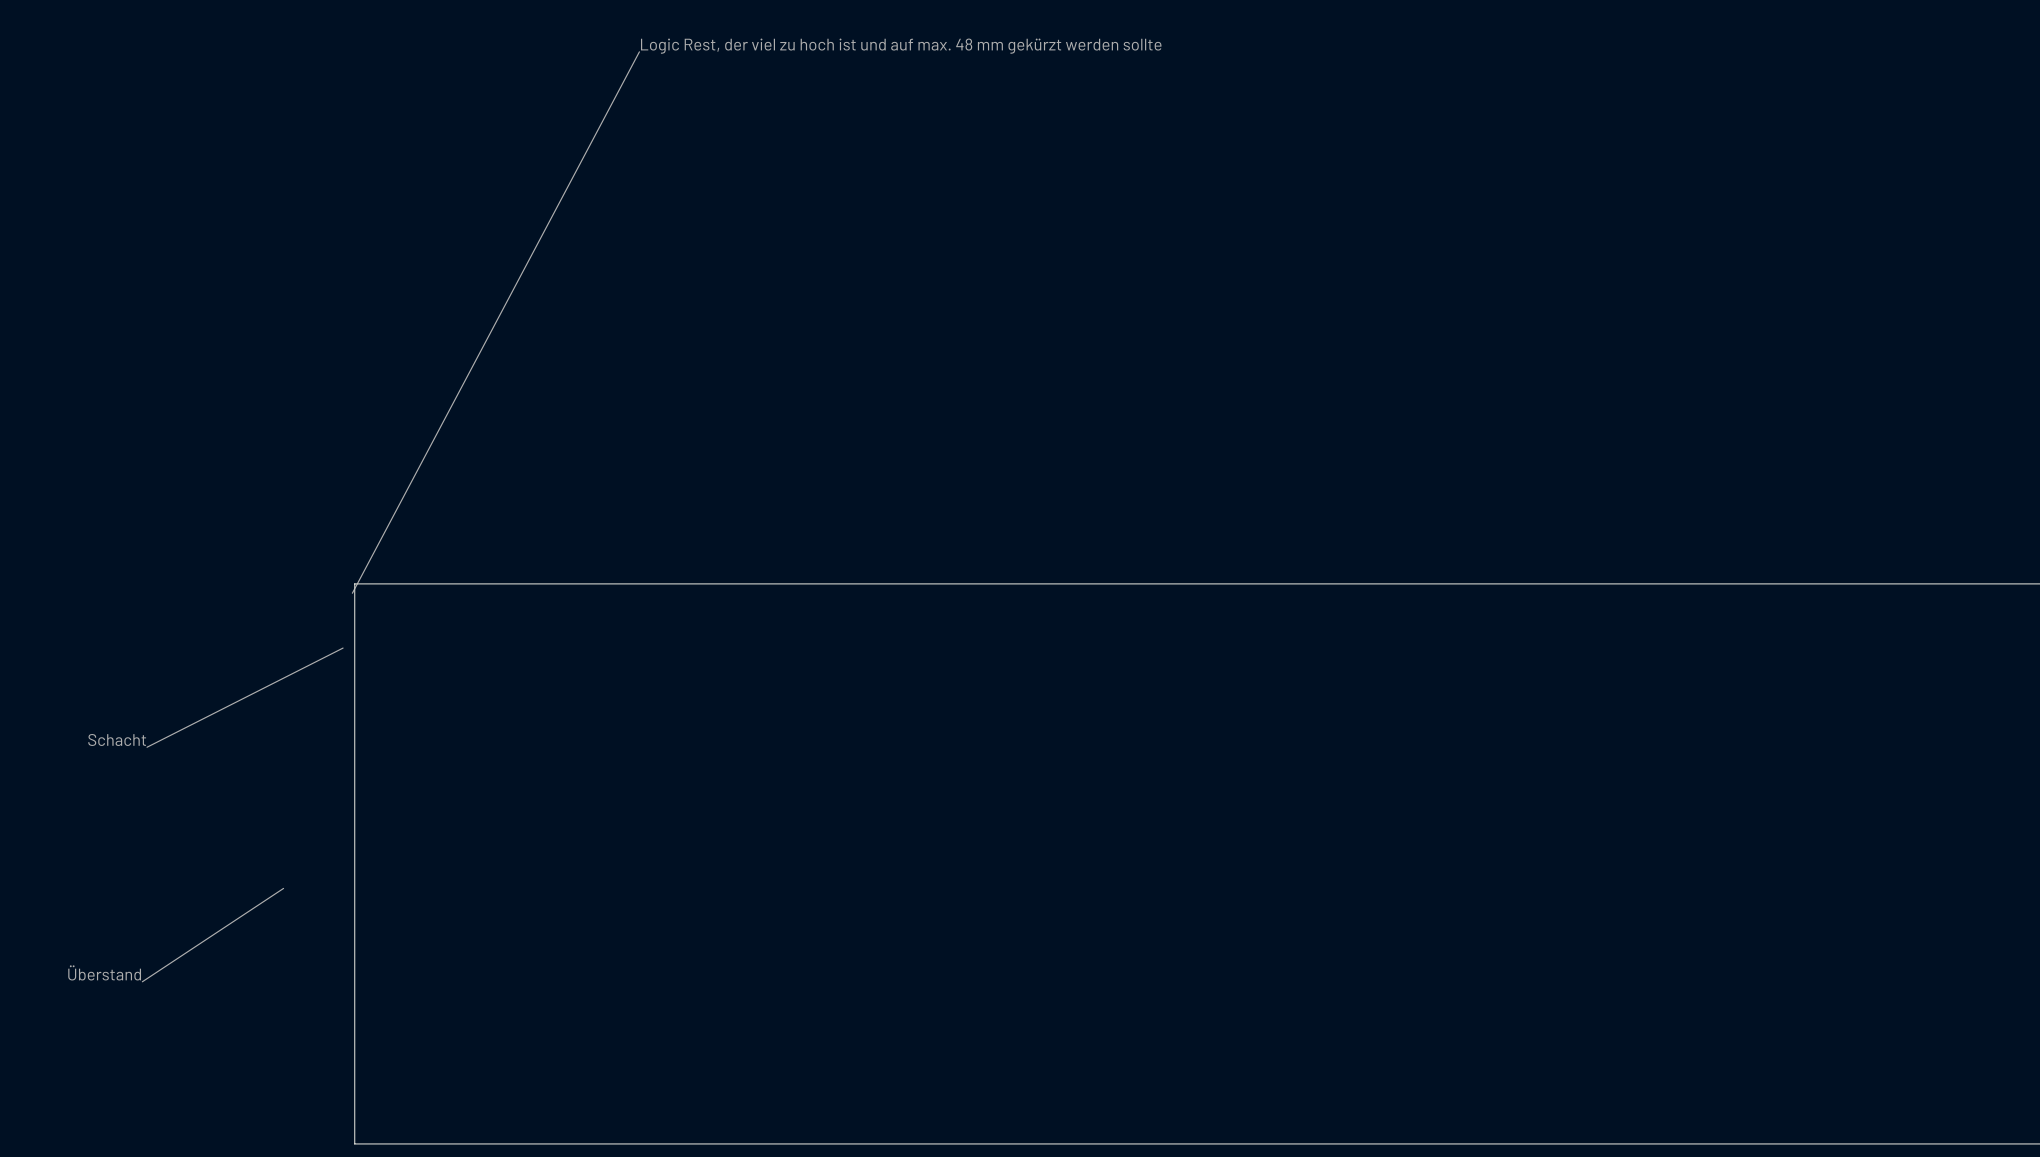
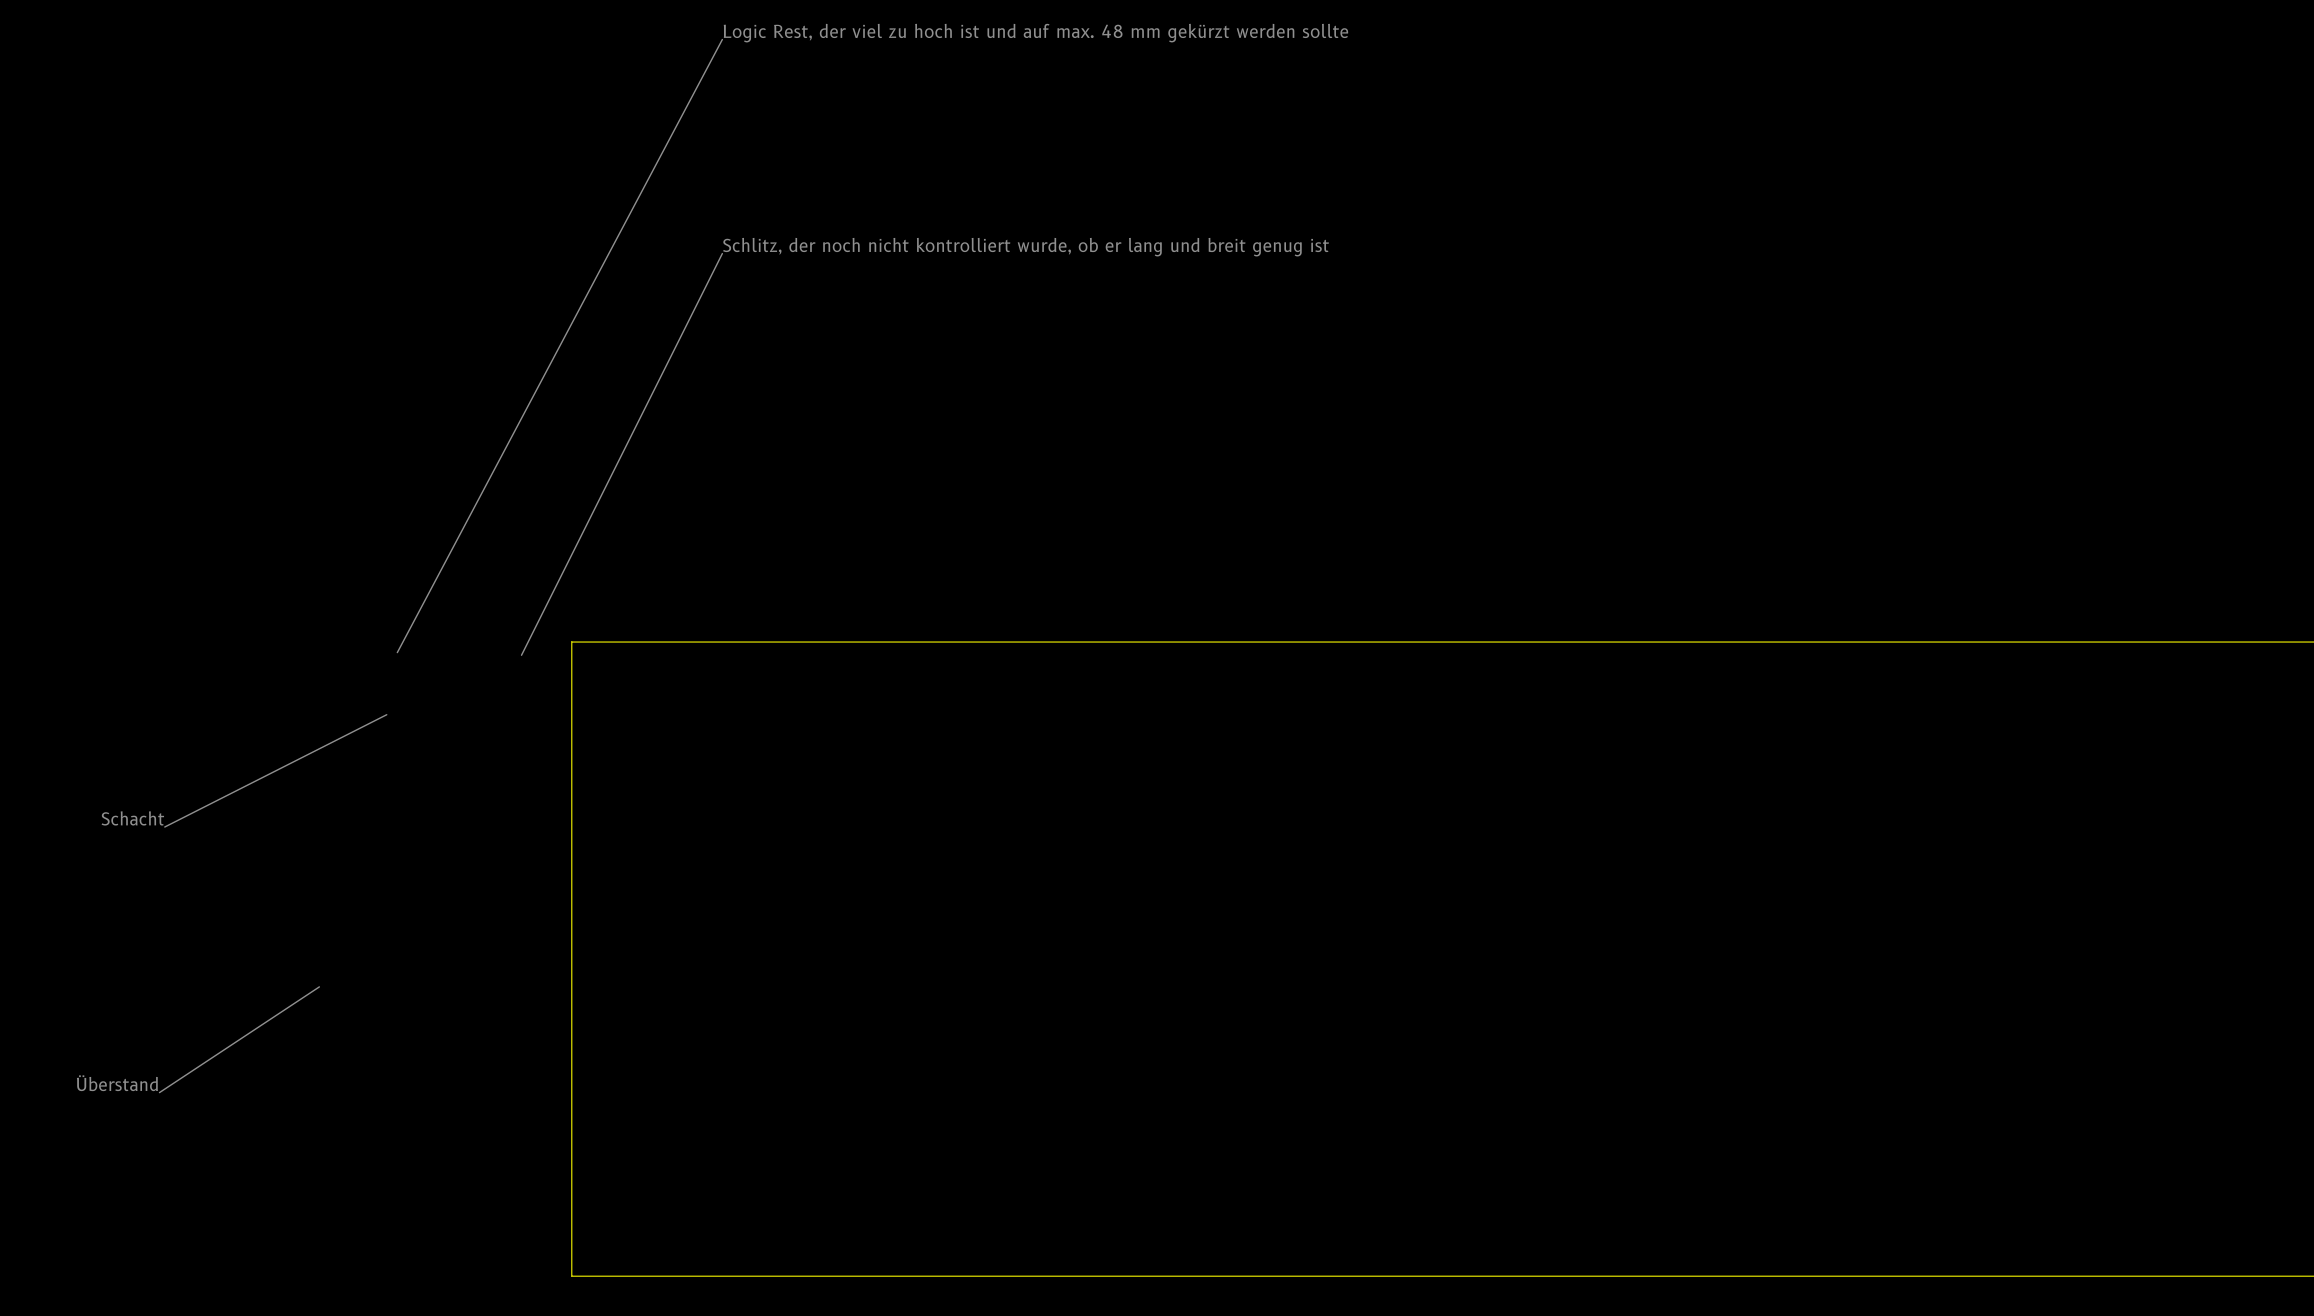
text: none -> Schlitz, der noch nicht kontrolliert wurde, ob er lang und breit genug ist (1025, 247)
line: none -> (722, 253) (521, 655)
board edge: (506, 583) (354, 583) (354, 1143) (506, 1143) -> (571, 642) (571, 1276)

